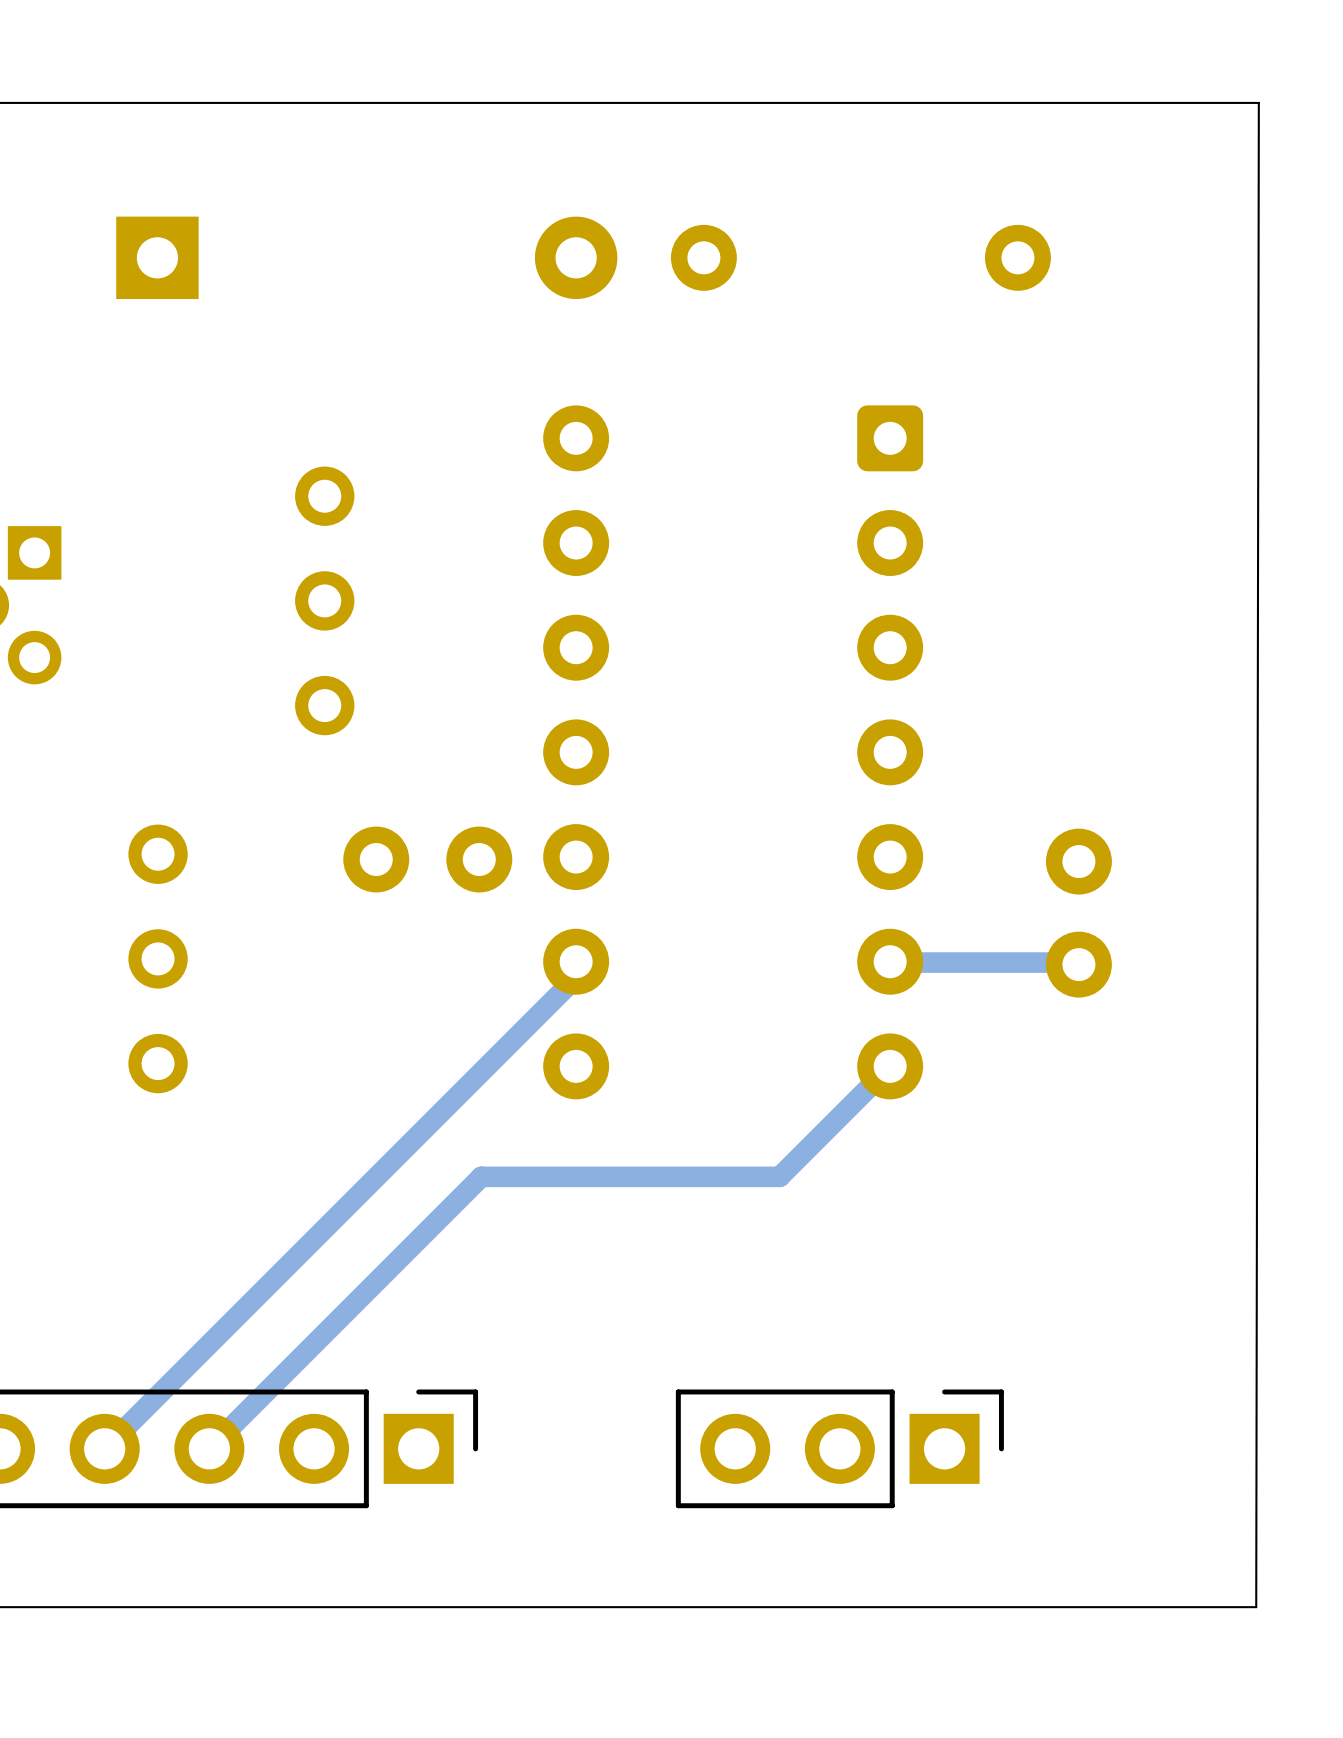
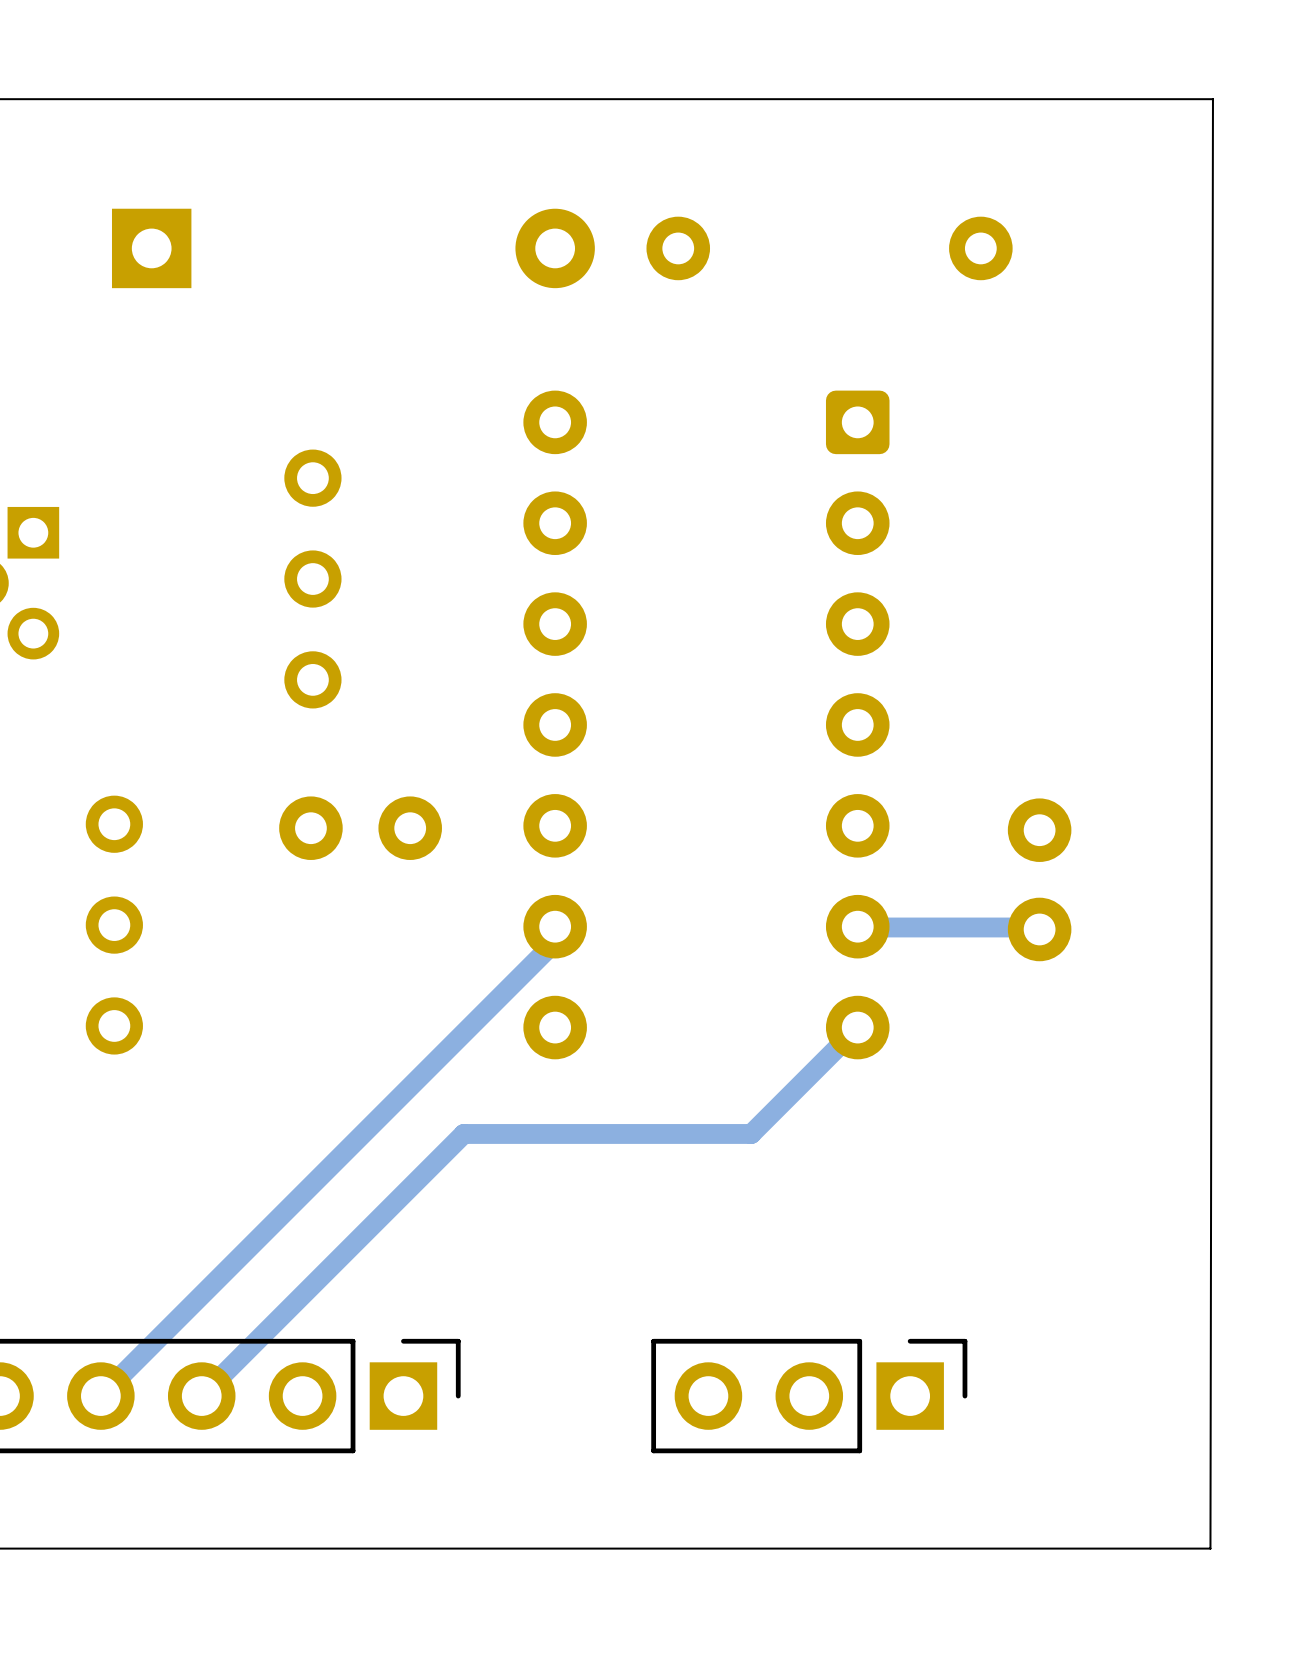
part position: (427, 859) -> (360, 828)
part position: (158, 958) -> (114, 925)

